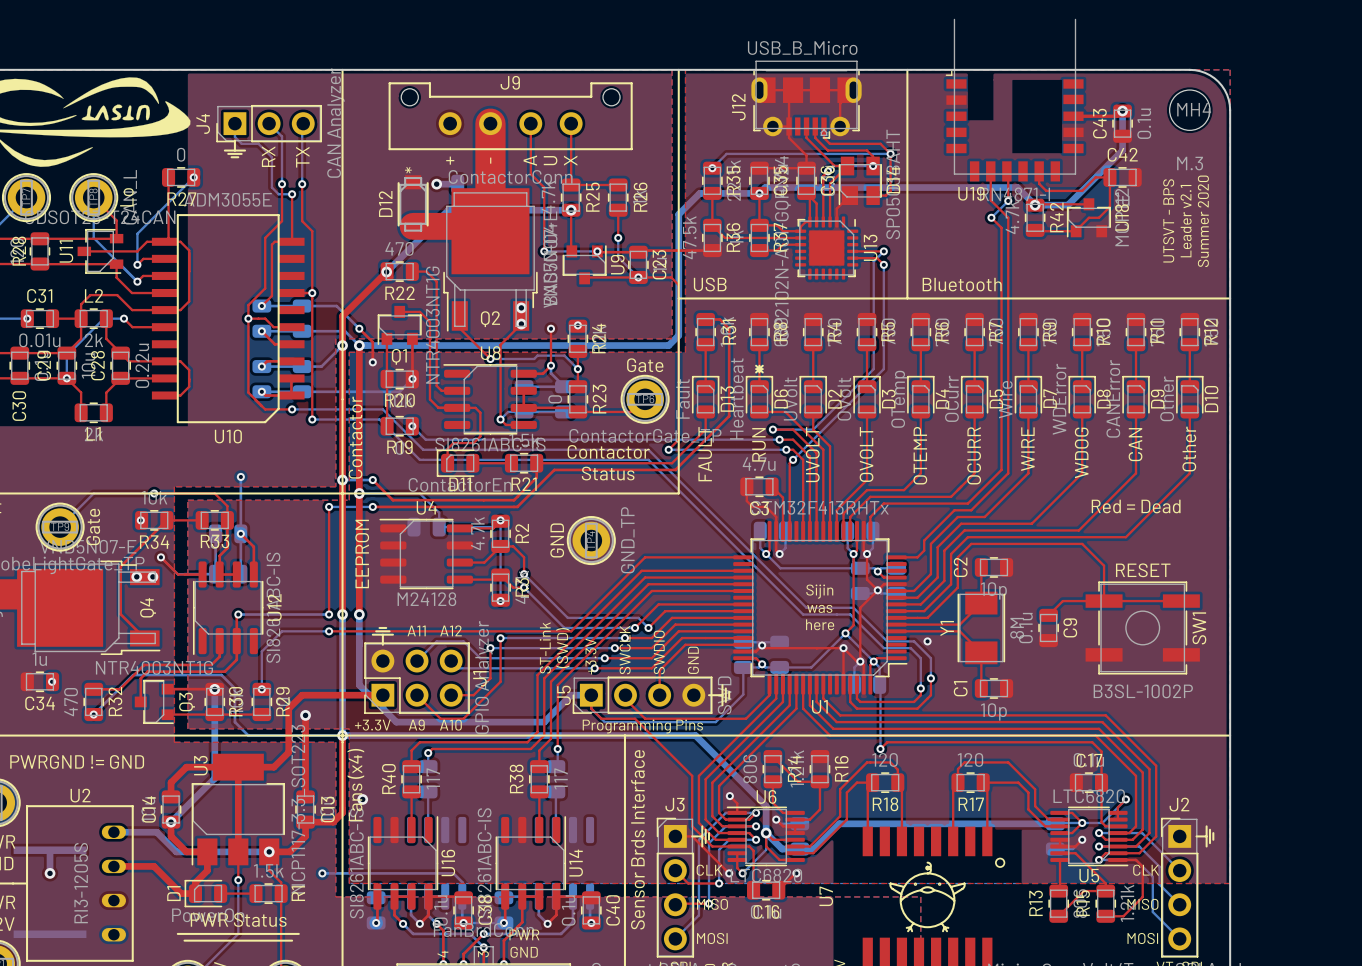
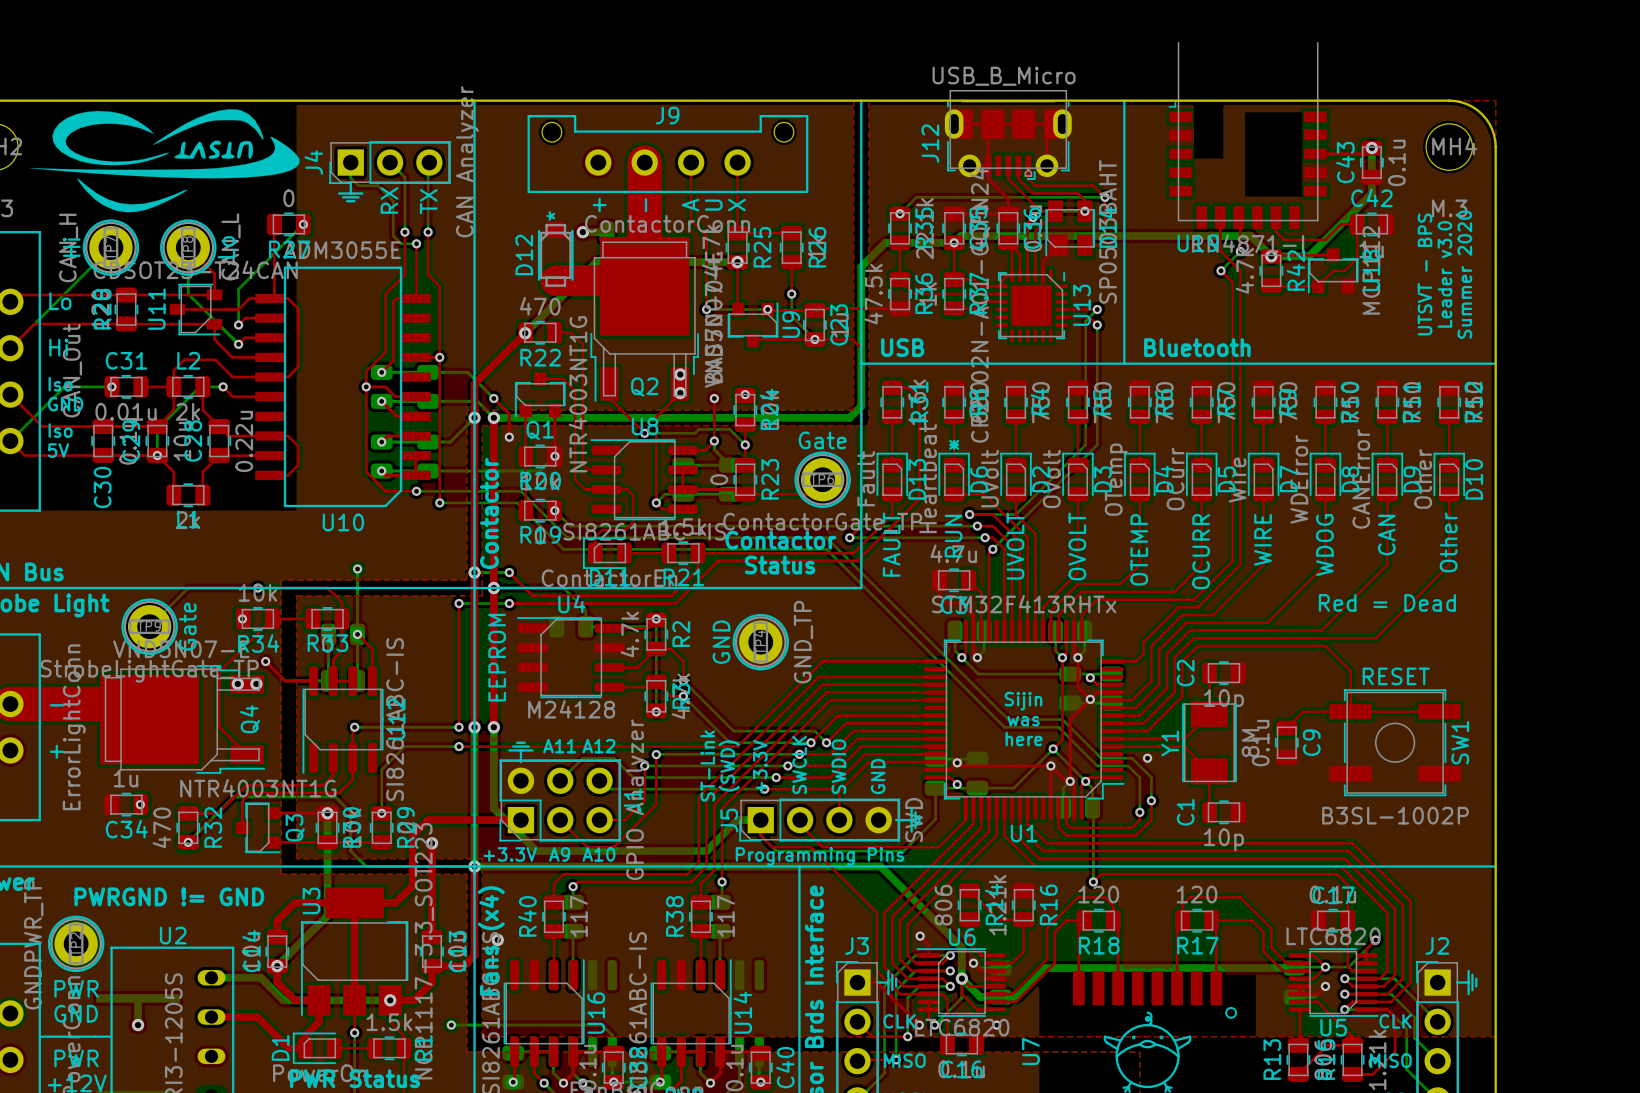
text: Leader v2.1 (1186, 221) -> Leader v3.0 (1444, 274)

